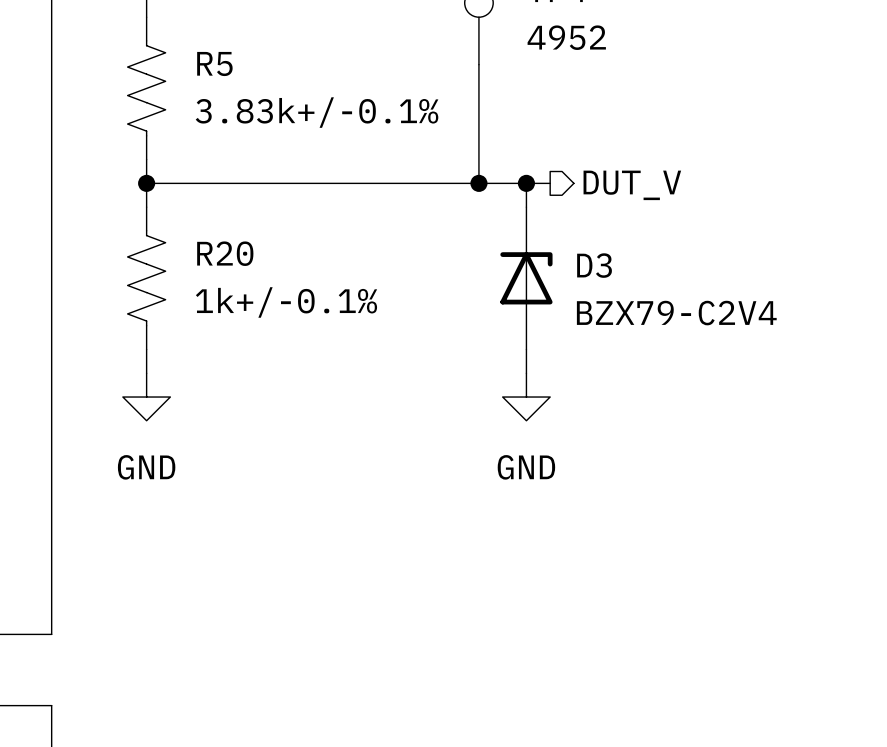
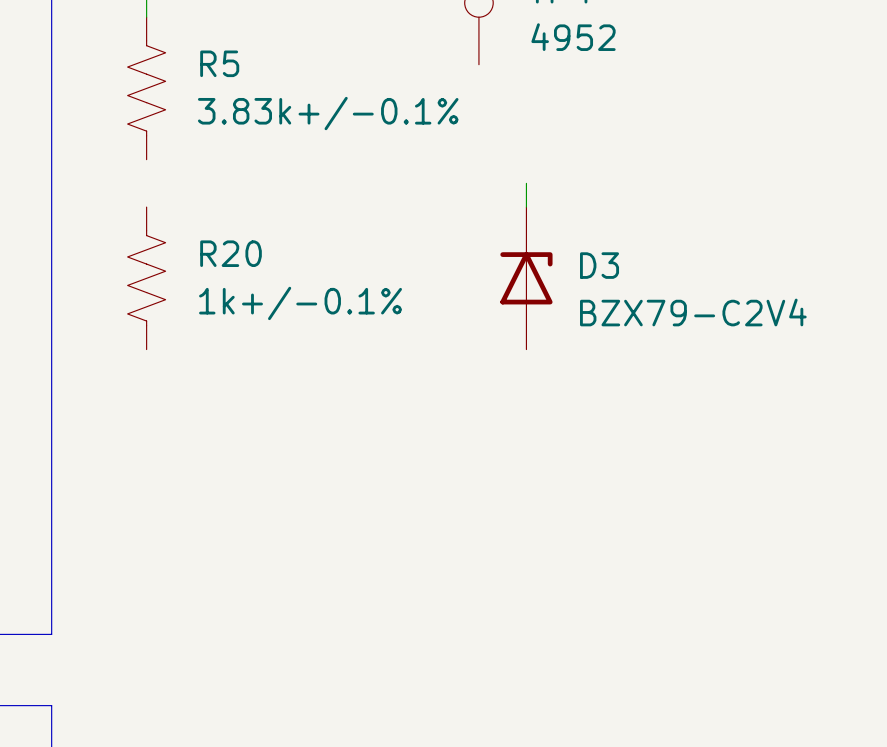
wire: (478, 64) (478, 183) -> none
wire: (146, 159) (146, 207) -> none
wire: (146, 183) (550, 183) -> none
junction: (146, 183) -> none
junction: (478, 183) -> none
junction: (526, 183) -> none
hierarchical label: DUT_V (632, 185) -> none
wire: (146, 349) (146, 373) -> none
wire: (526, 349) (526, 373) -> none
power symbol: GND (146, 397) -> none
power symbol: GND (526, 397) -> none

